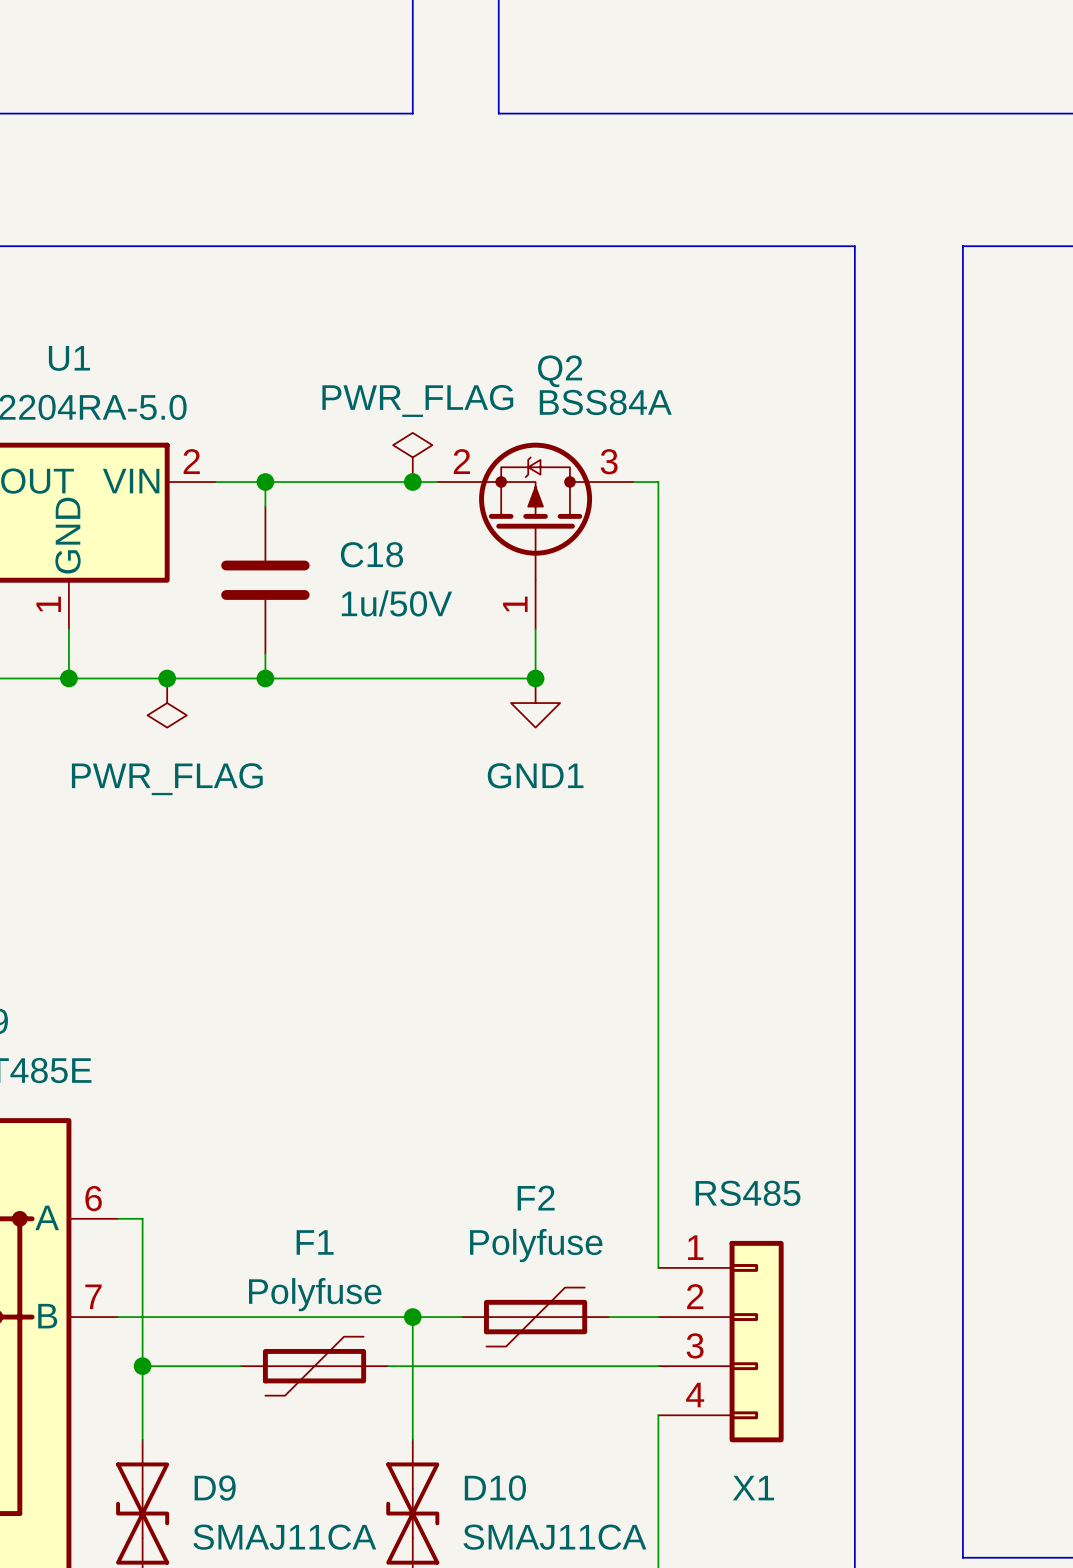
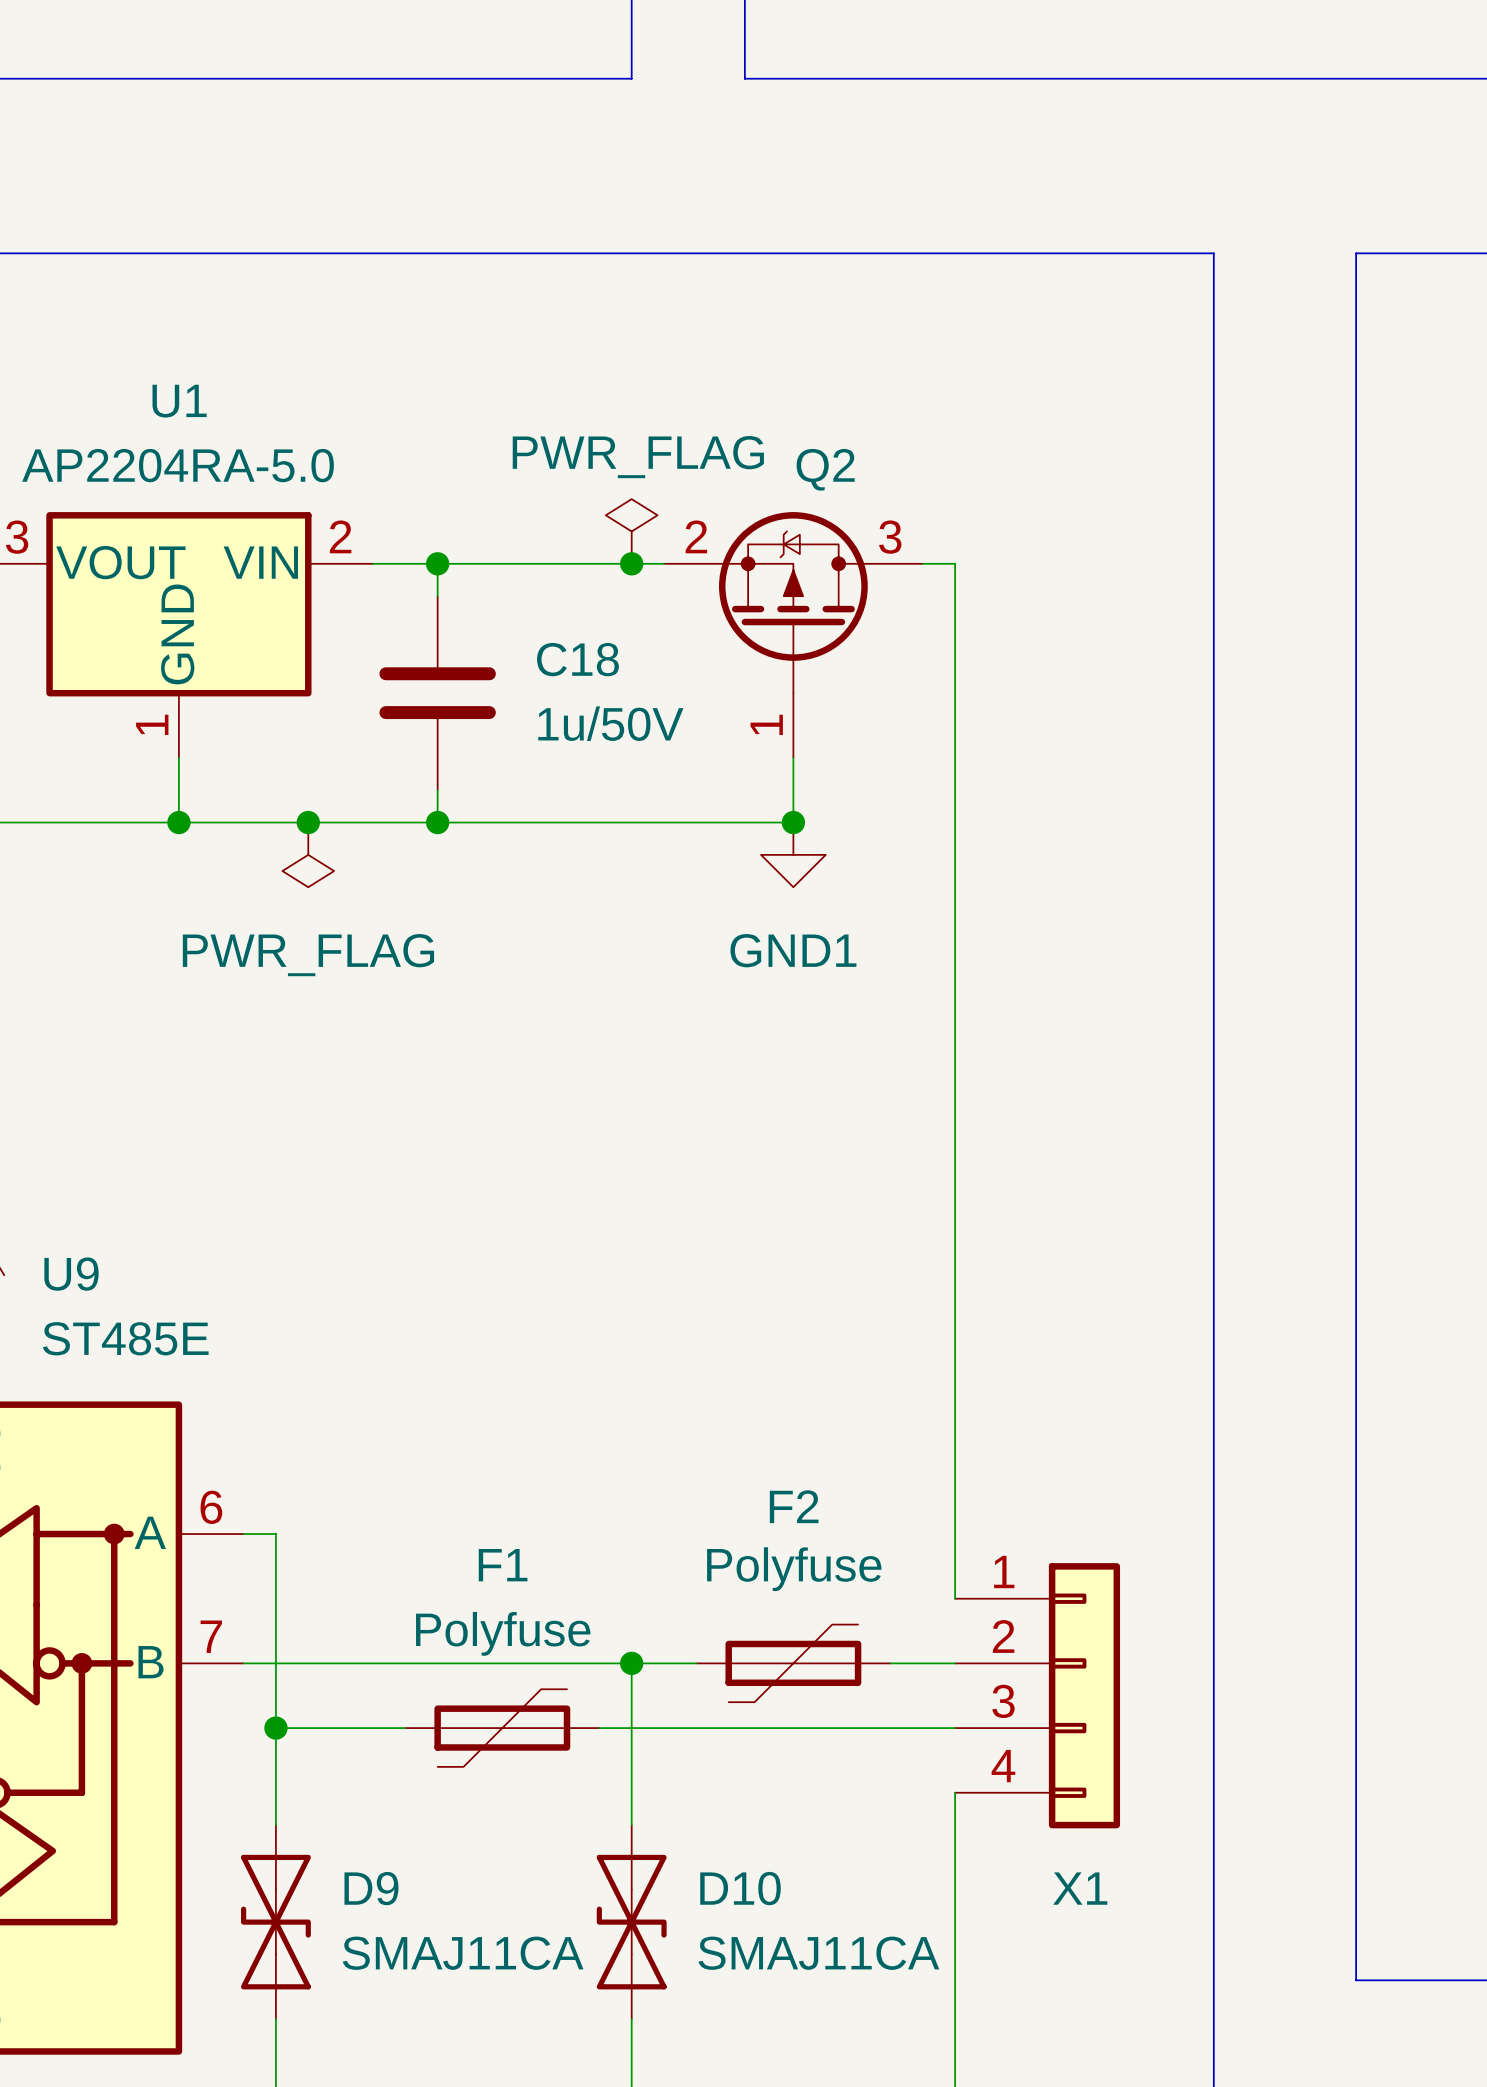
Q2 name position: Q2 (560, 371) -> Q2 (825, 469)
Q2 value: BSS84A (605, 402) -> none
X1 value: RS485 (748, 1193) -> none

